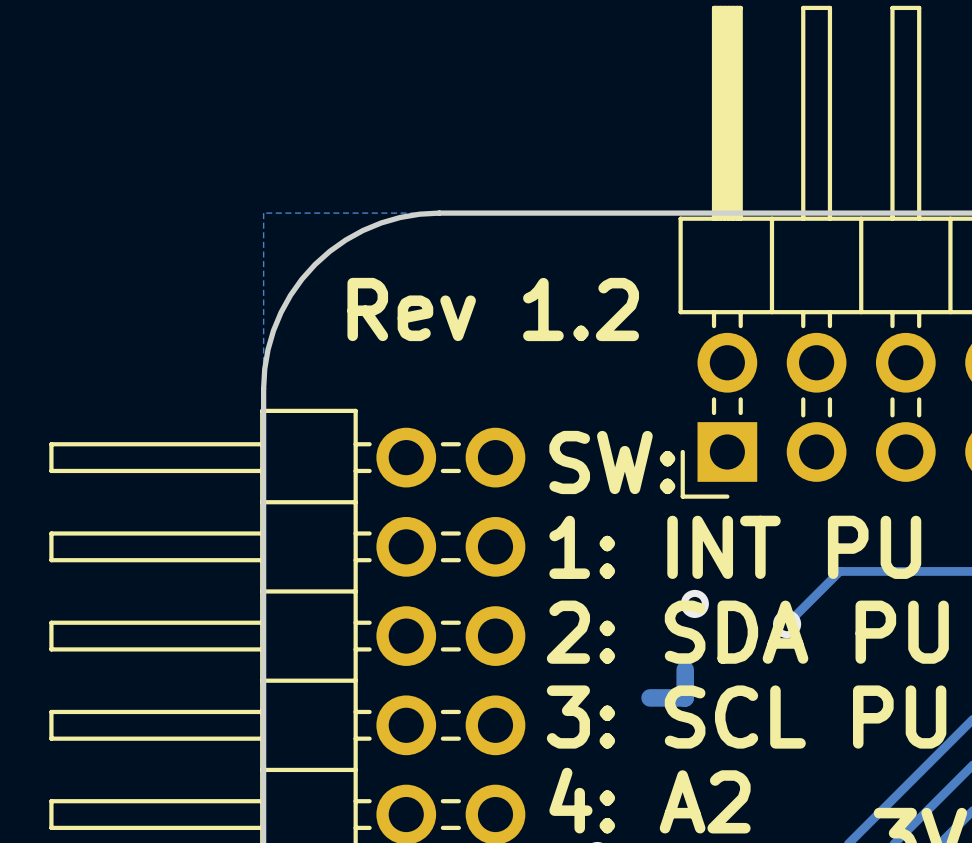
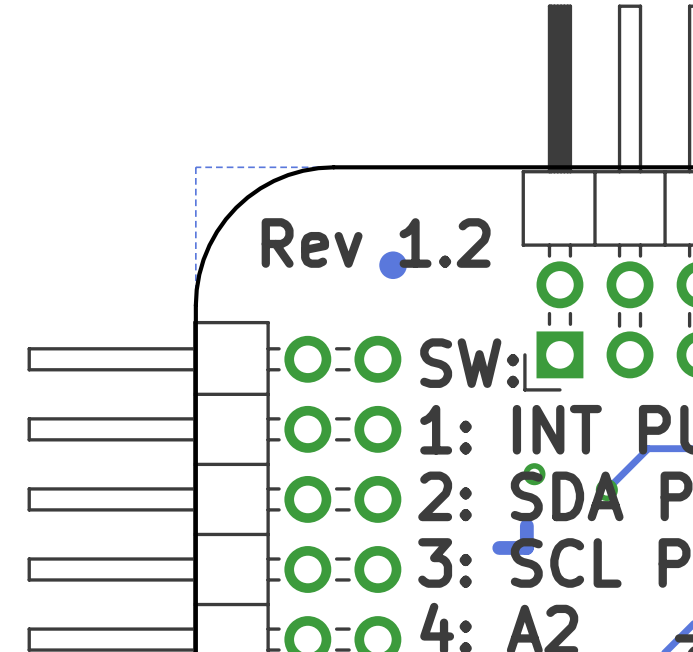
part: none -> (393, 265)

